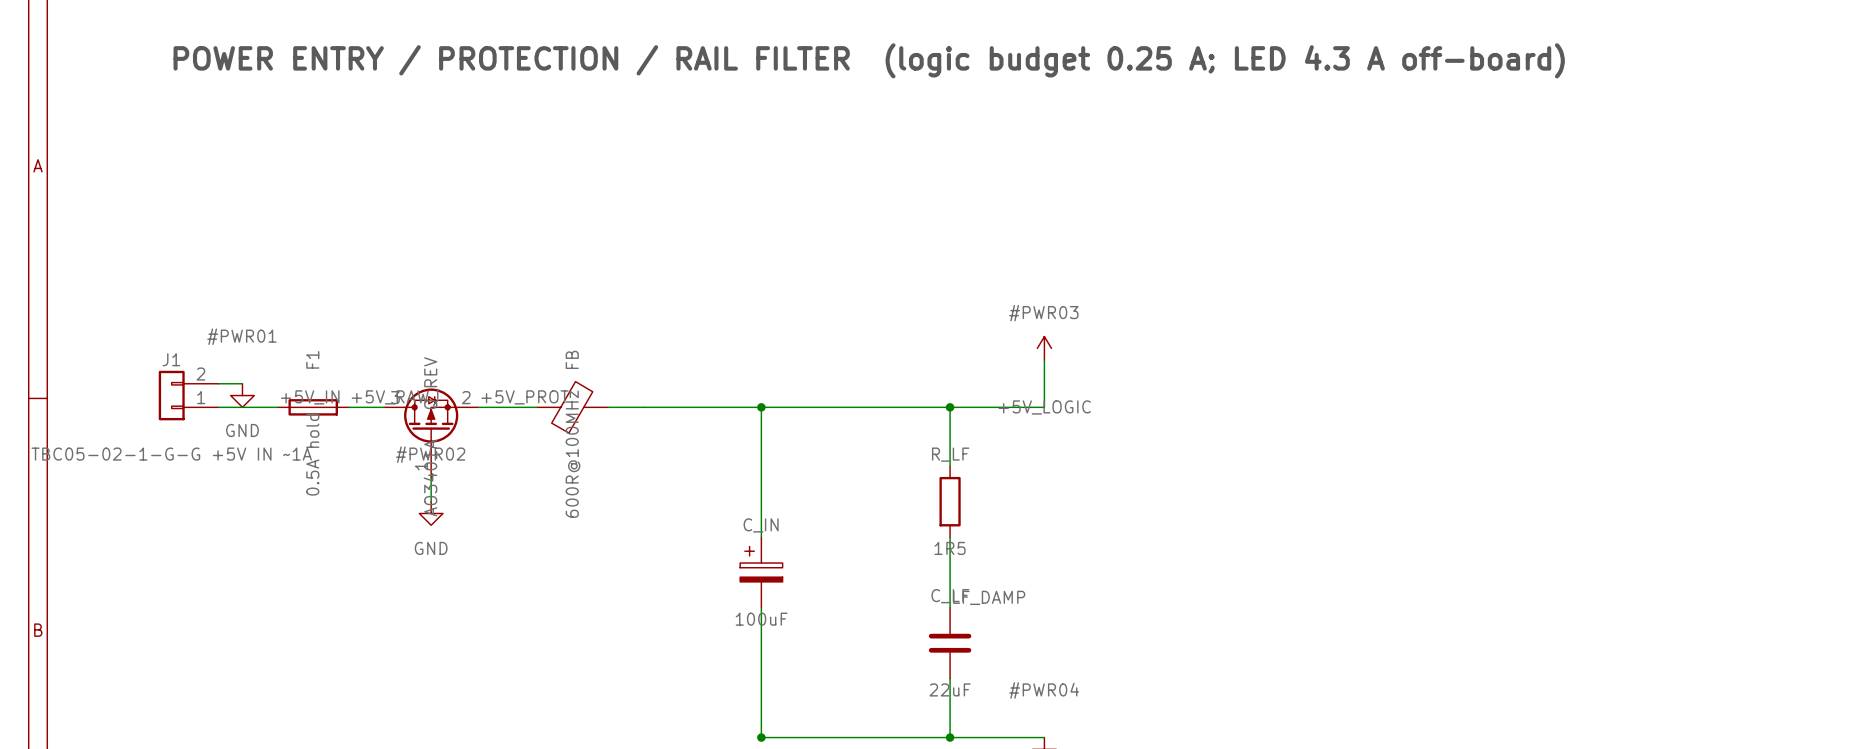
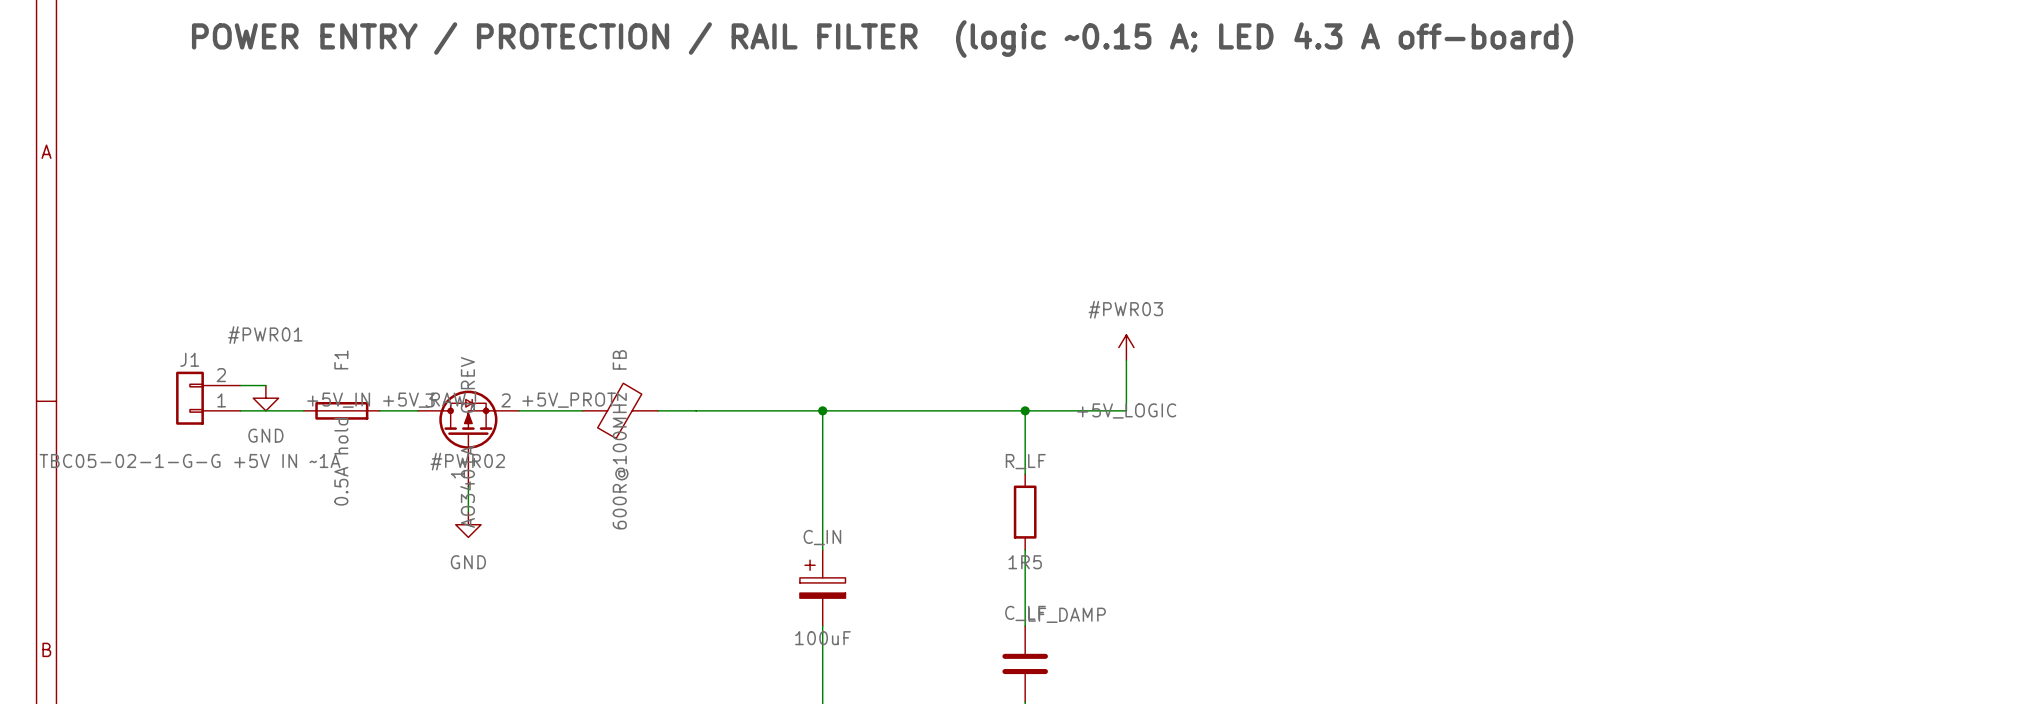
text: POWER ENTRY / PROTECTION / RAIL FILTER (logic budget 0.25 A; LED 4.3 A off-board) (869, 60) -> POWER ENTRY / PROTECTION / RAIL FILTER (logic ~0.15 A; LED 4.3 A off-board) (882, 39)

